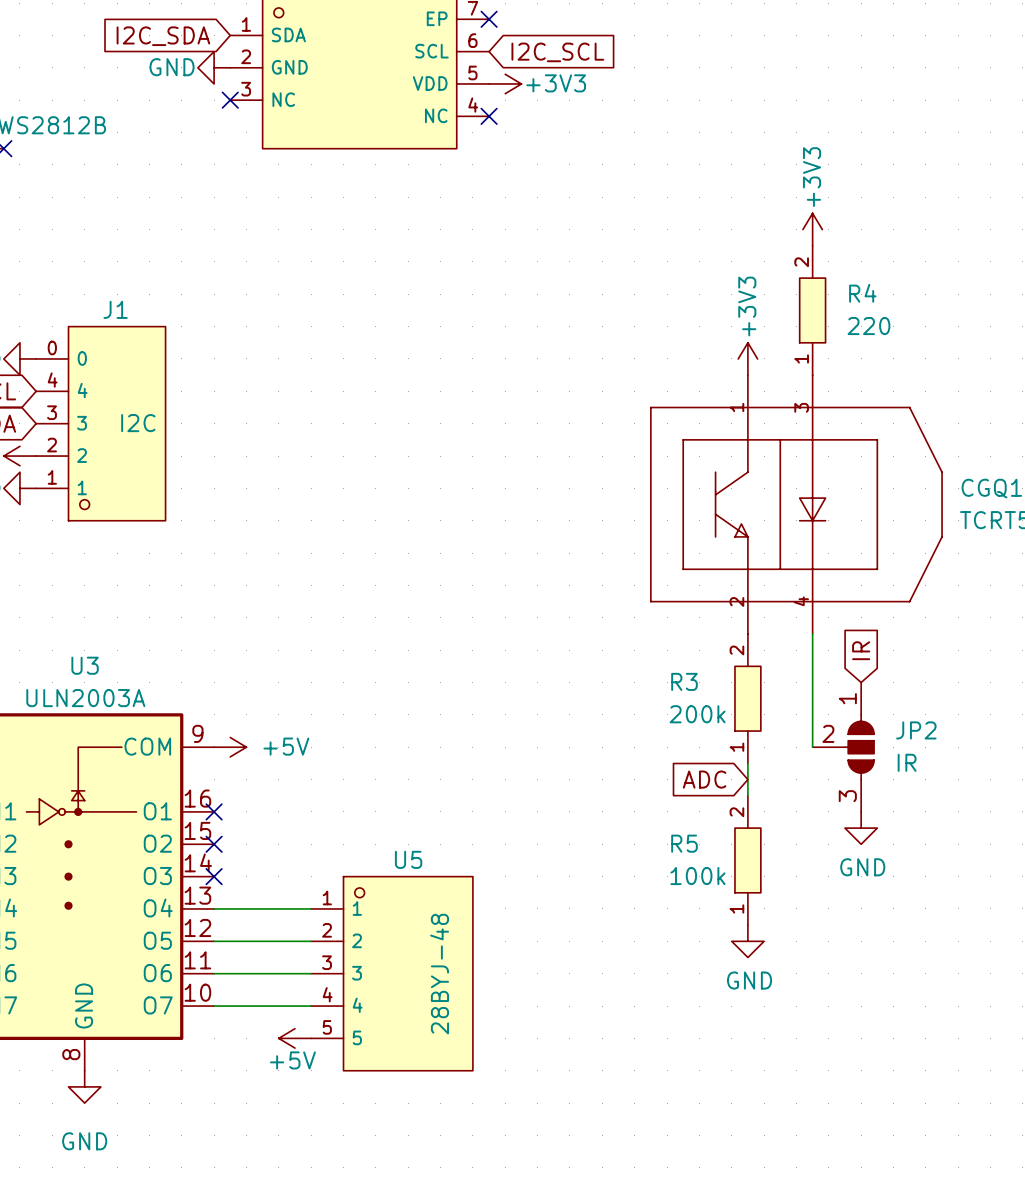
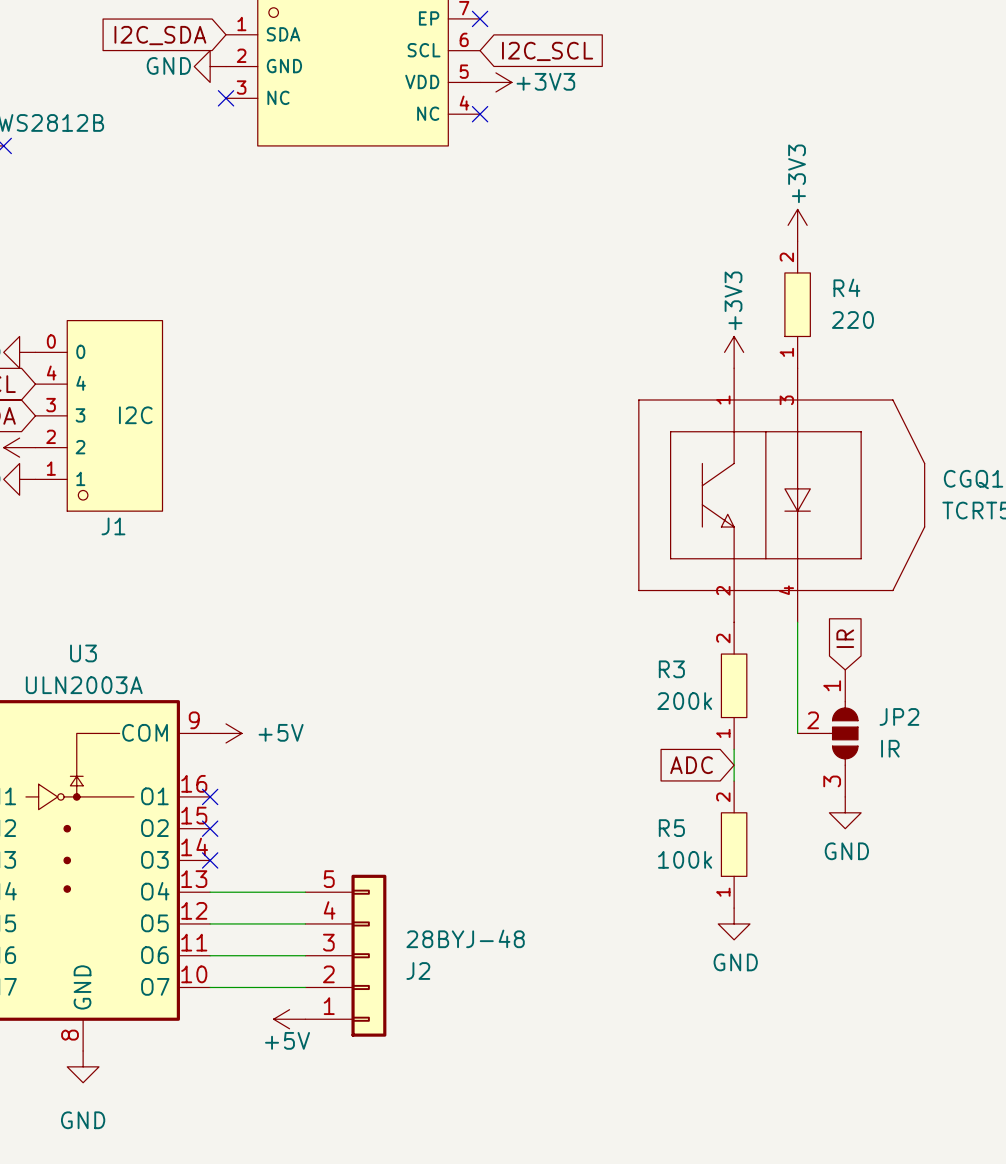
J1 name position: J1 (115, 309) -> J1 (113, 526)
J2: none -> 28BYJ-48 (345, 955)
U5: 28BYJ-48 (392, 973) -> none

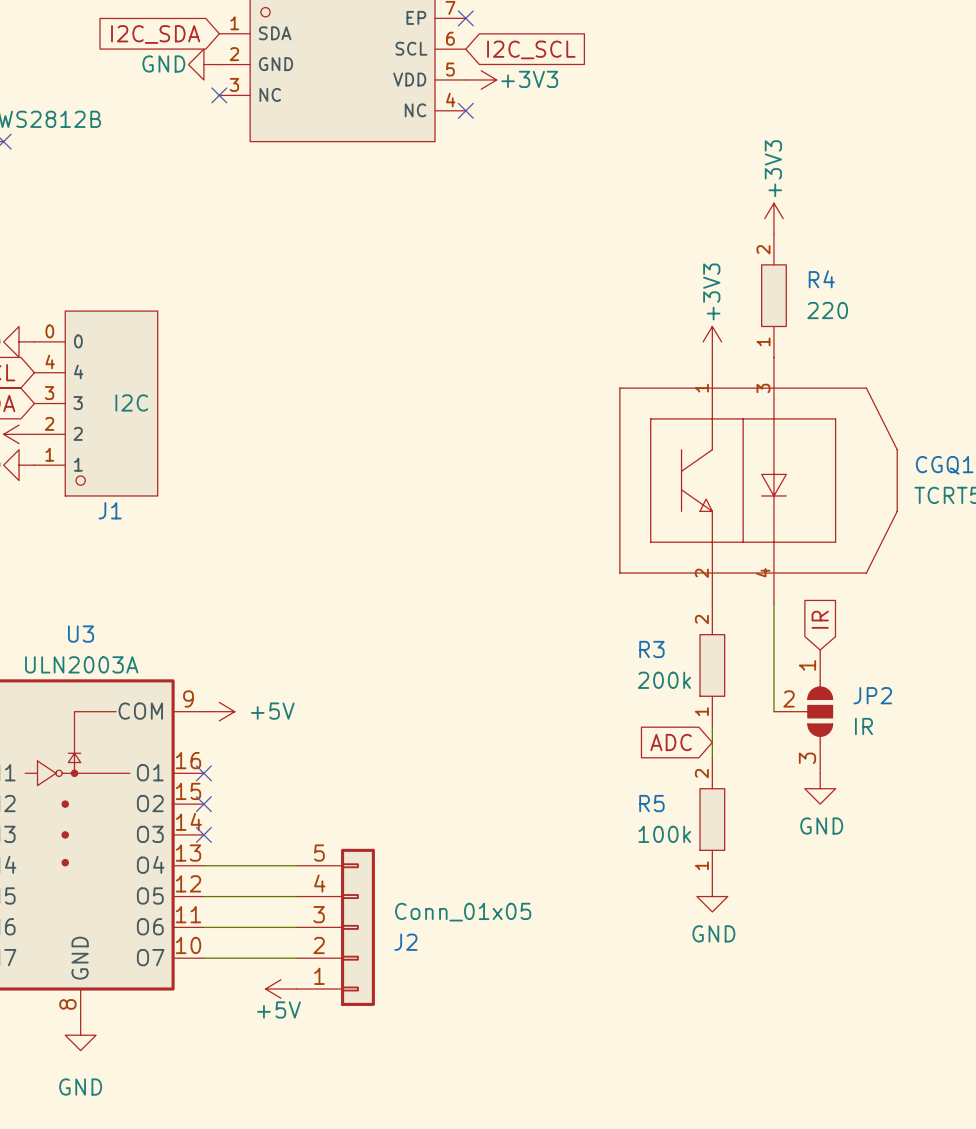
J2 value: 28BYJ-48 (465, 938) -> Conn_01x05 (463, 912)

